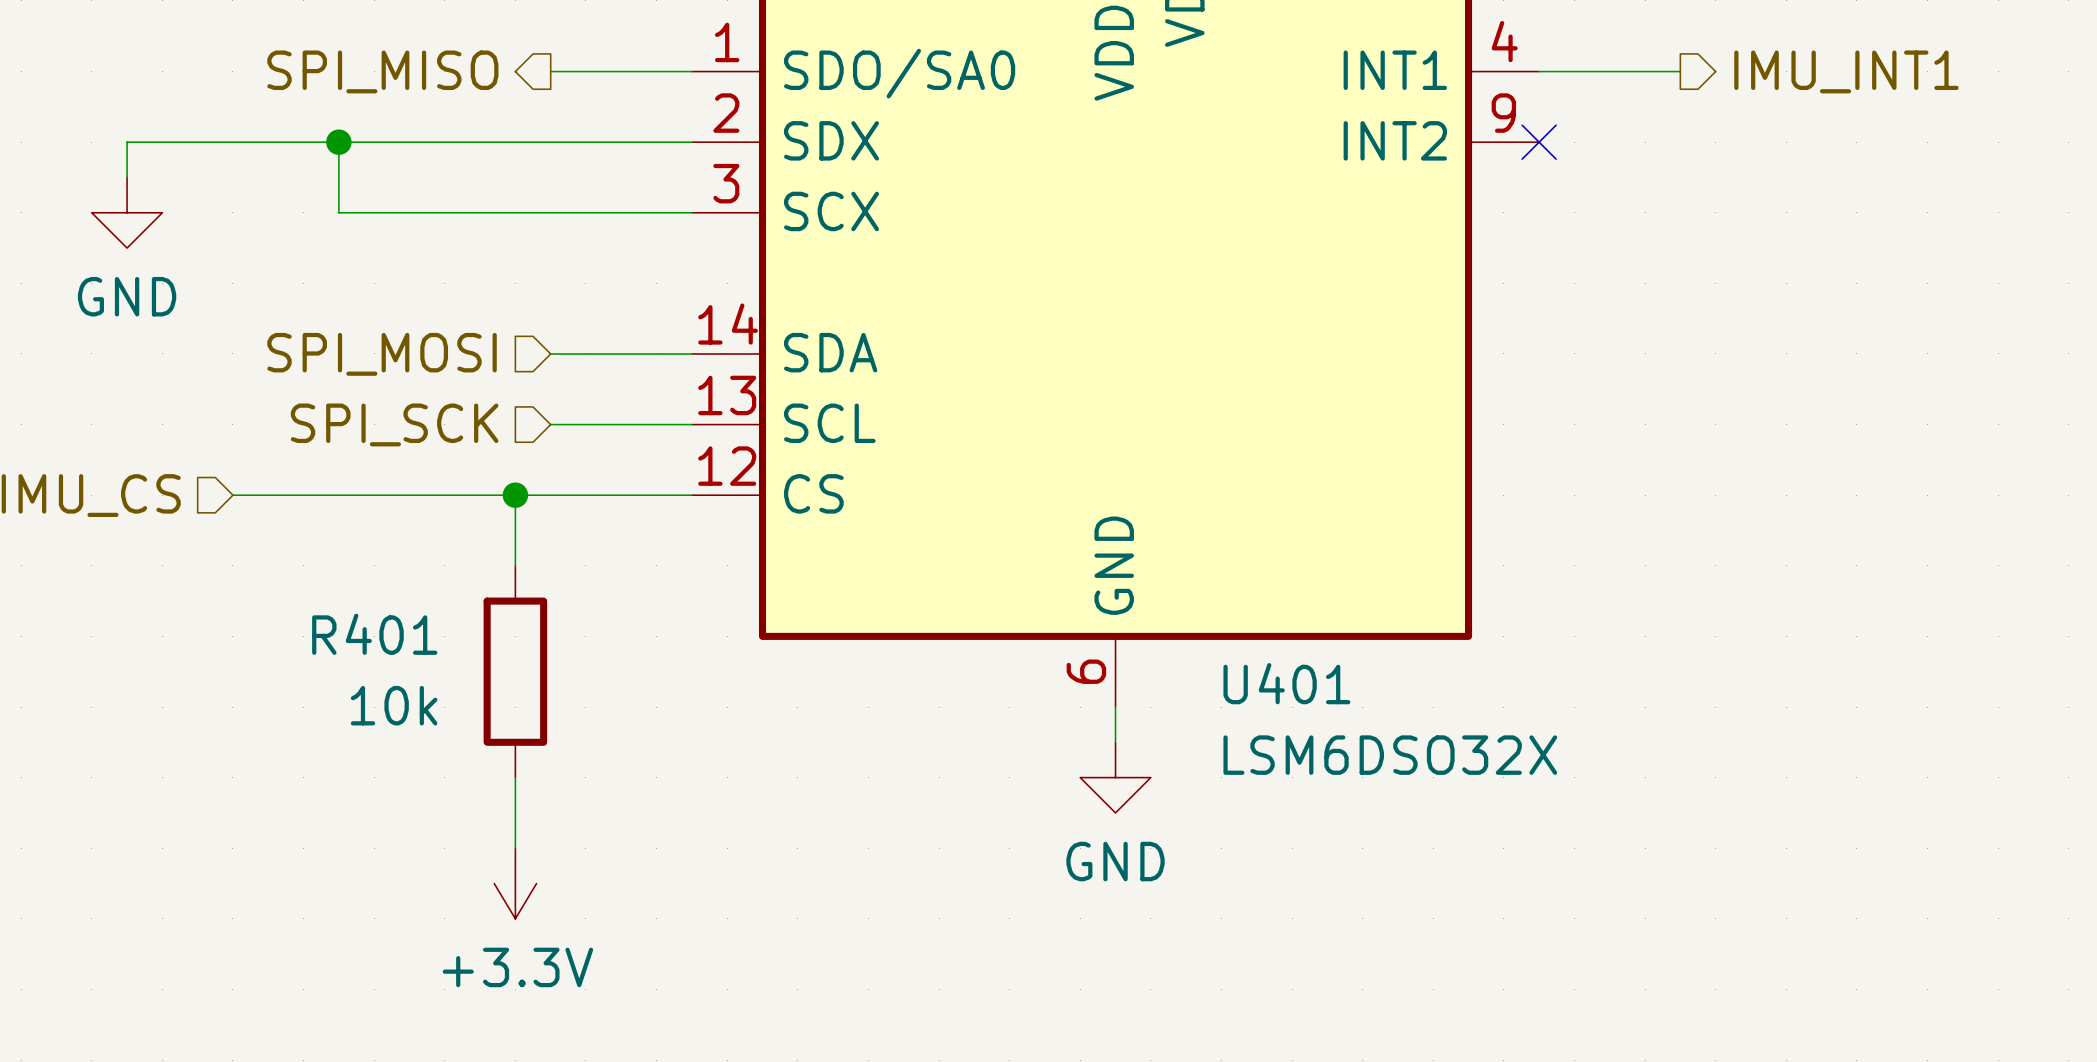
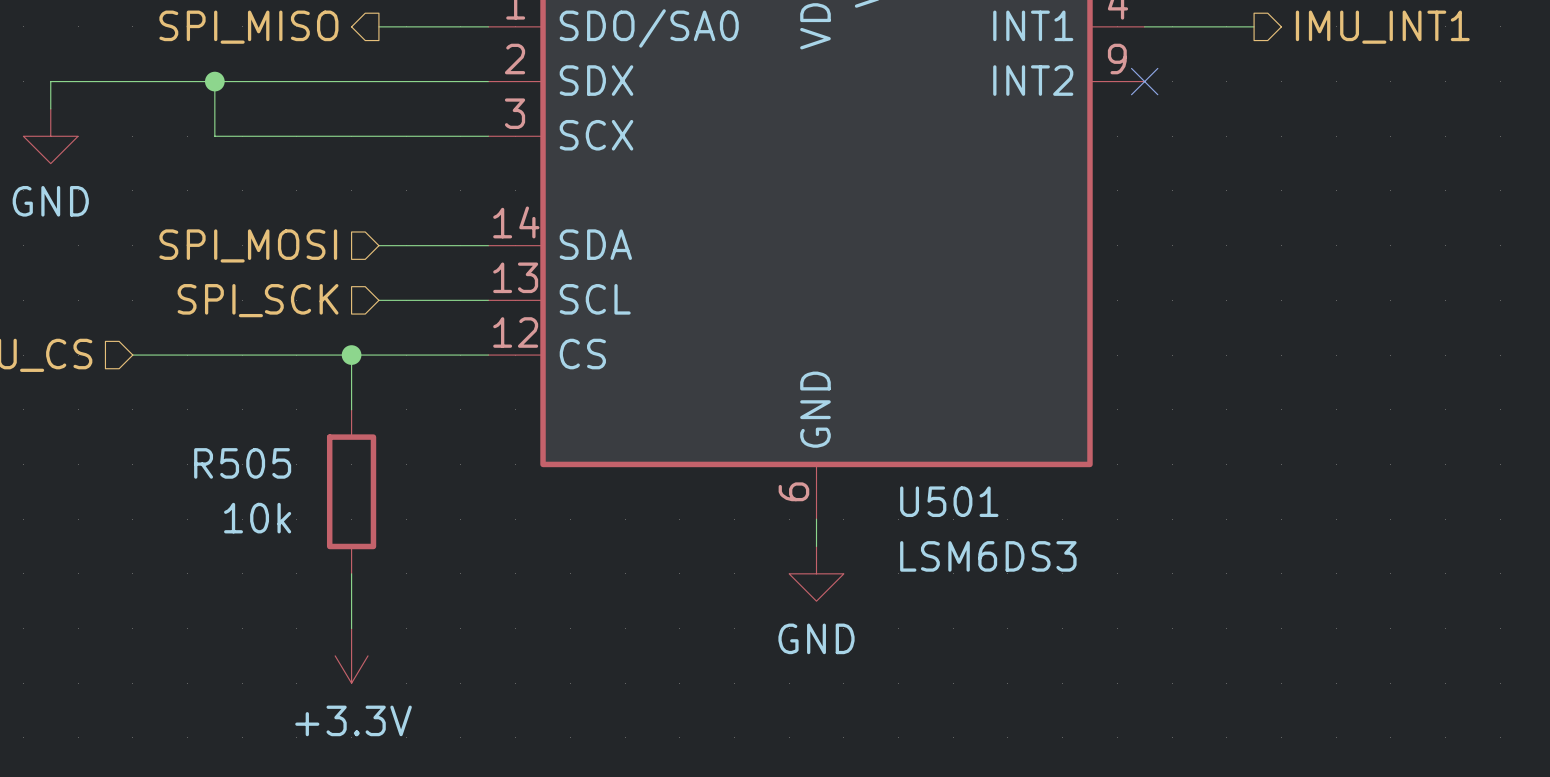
R401 name: R401 (374, 634) -> R505 (242, 463)
U401 name: U401 (1286, 683) -> U501 (949, 501)
U401 value: LSM6DSO32X (1390, 755) -> LSM6DS3 (988, 556)

